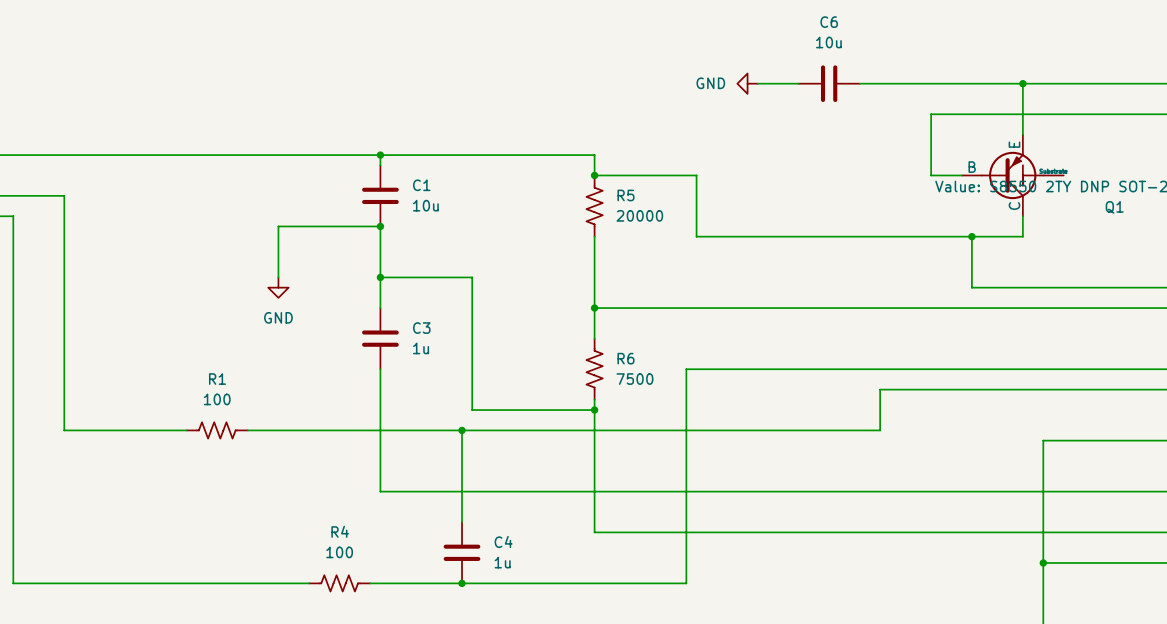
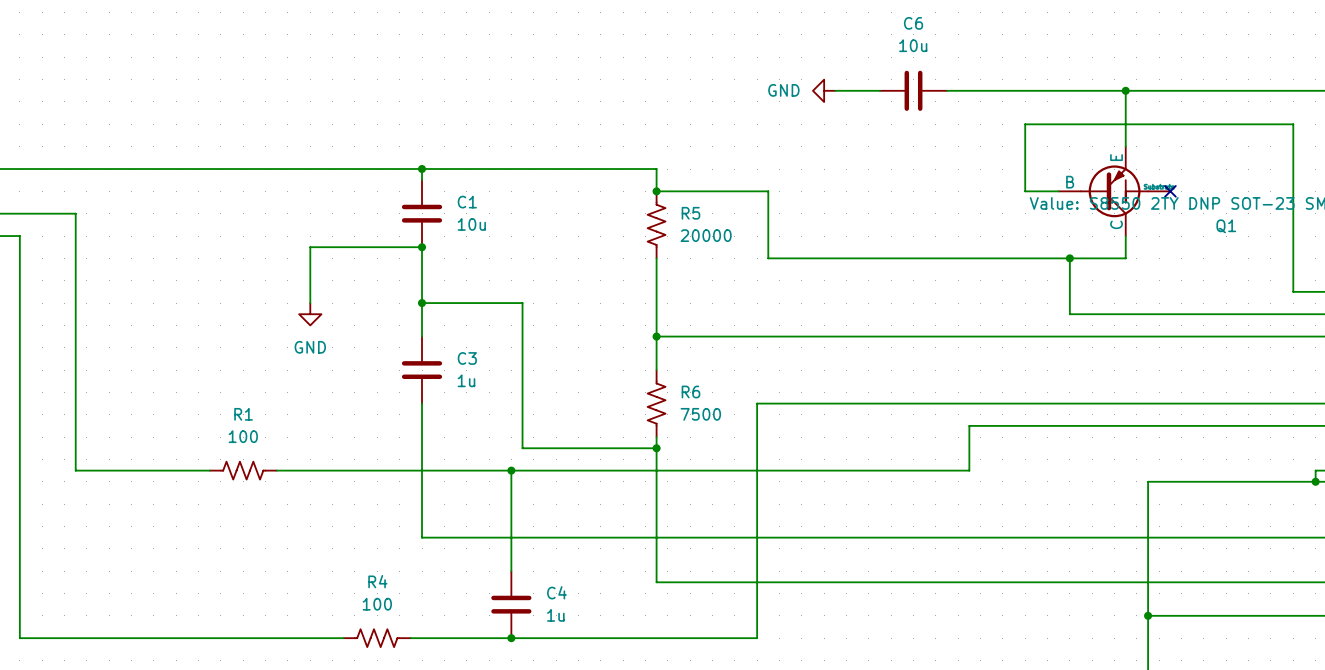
no-connect mark: none -> (1170, 191)

